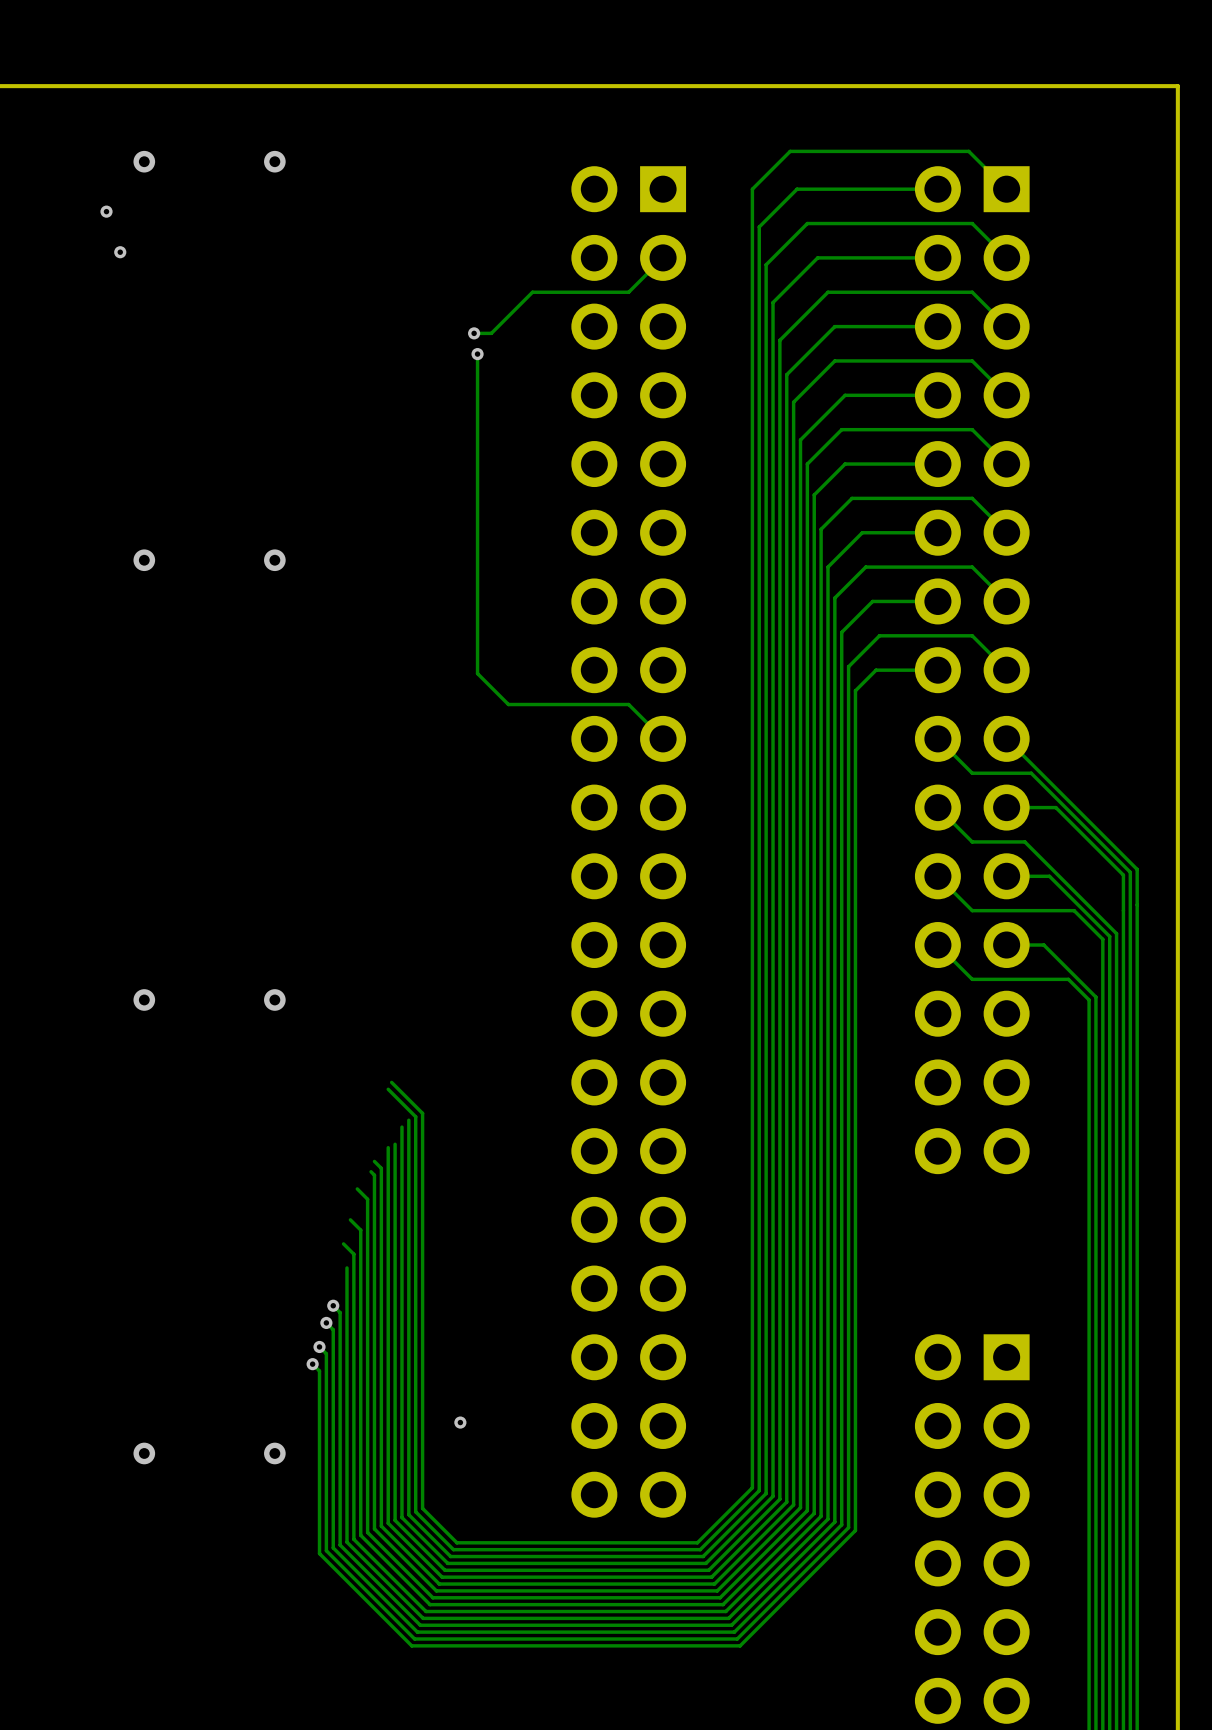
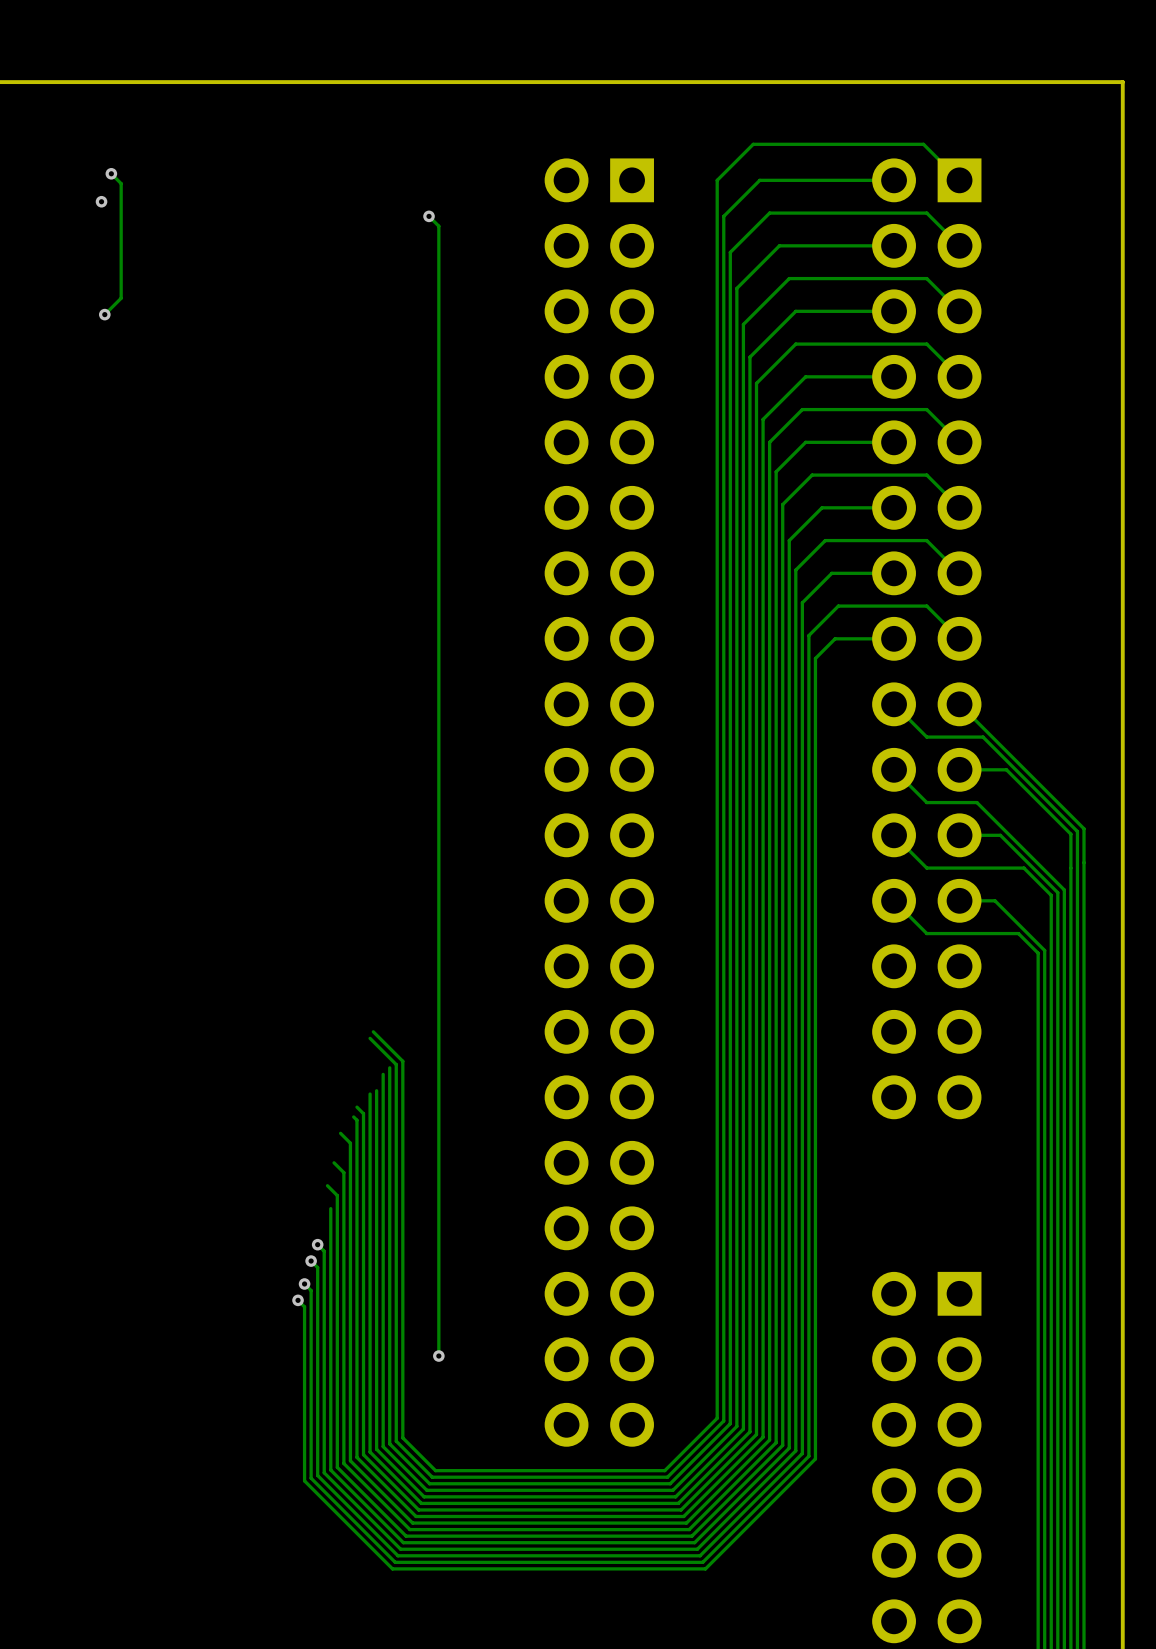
via: (144, 161) -> none
via: (274, 161) -> none
track: none -> (111, 173) (121, 183) (121, 298) (104, 314)
via: none -> (111, 173)
track: none -> (429, 216) (438, 226) (438, 1356)
via: none -> (429, 216)
via: (120, 252) -> none
track: (663, 257) (628, 292) (532, 292) (491, 333) (474, 333) -> none
via: none -> (104, 314)
via: (474, 333) -> none
track: (477, 354) (477, 673) (508, 704) (628, 704) (663, 738) -> none
via: (477, 354) -> none
via: (144, 560) -> none
via: (274, 560) -> none
via: (144, 999) -> none
via: (274, 999) -> none
via: (144, 1453) -> none
via: (274, 1453) -> none

